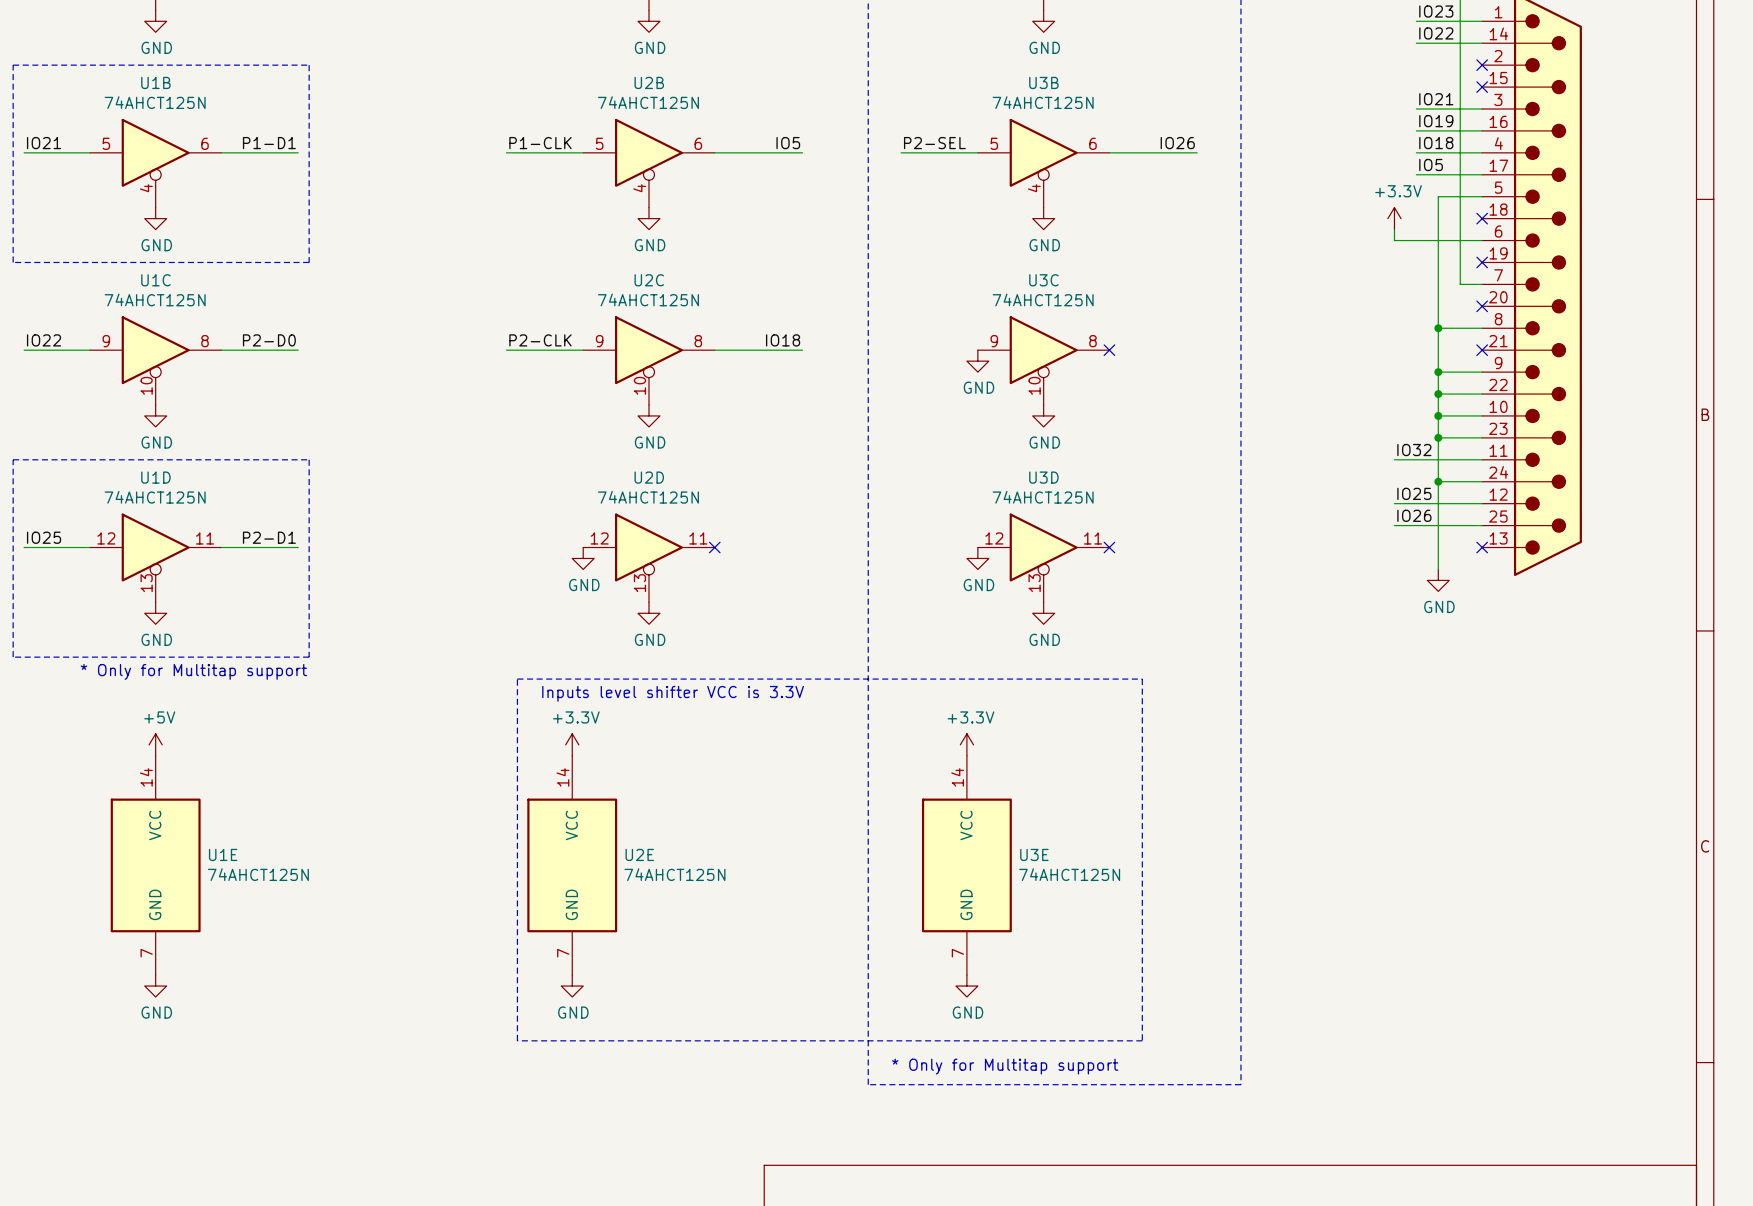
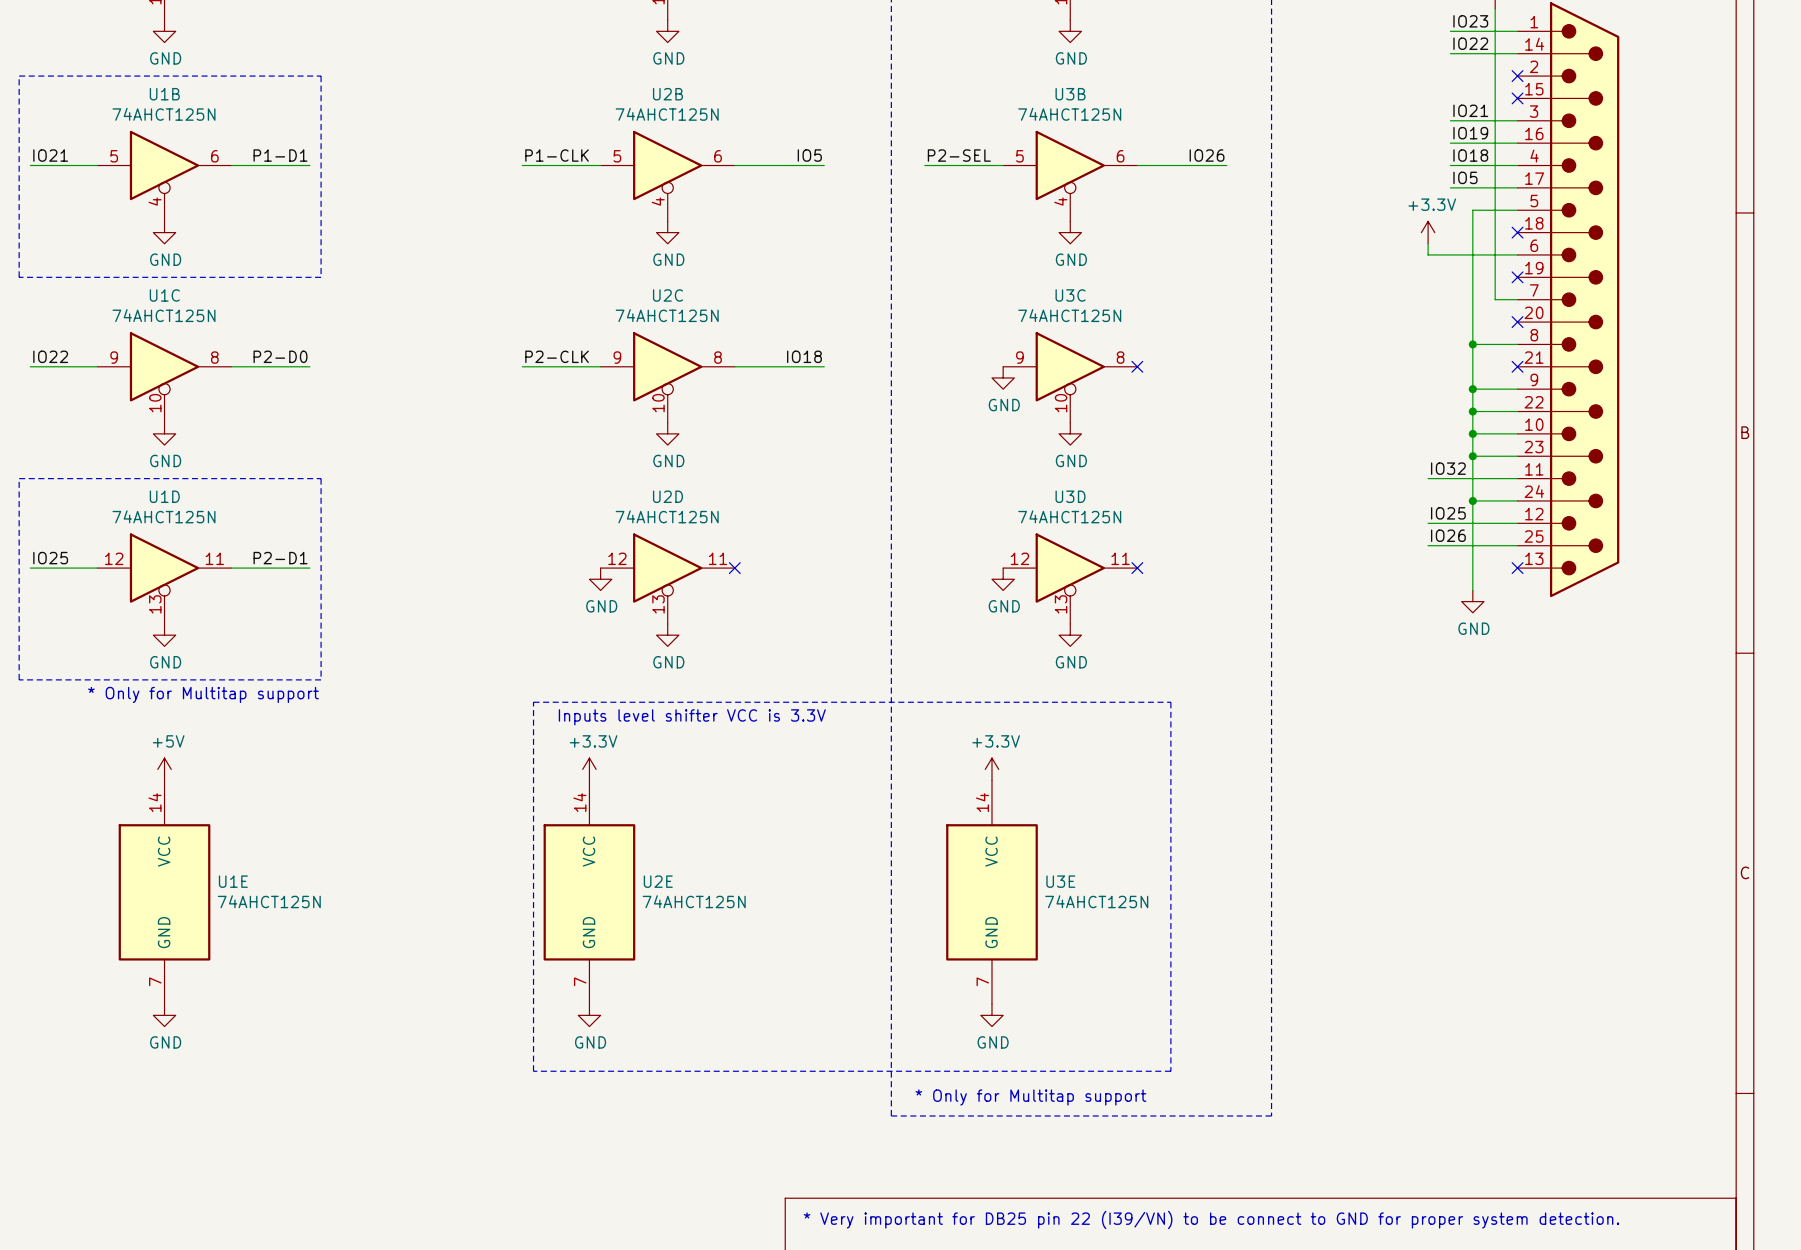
text: none -> * Very important for DB25 pin 22 (I39/VN) to be connect to GND for proper system detection. (1211, 1219)

